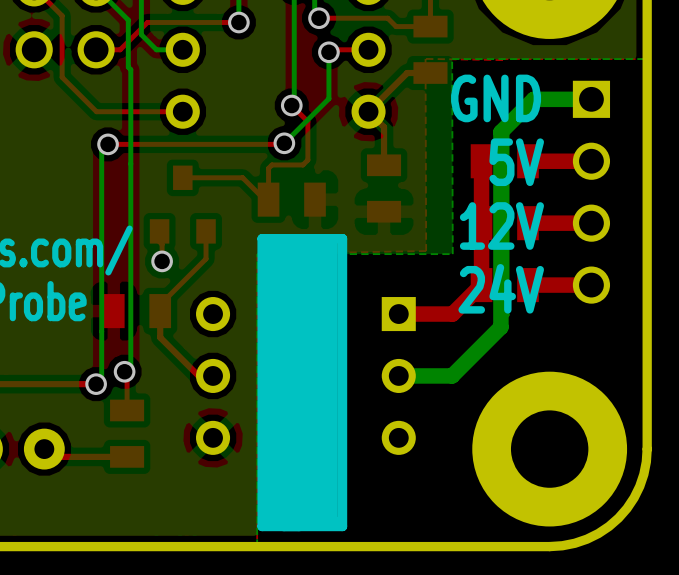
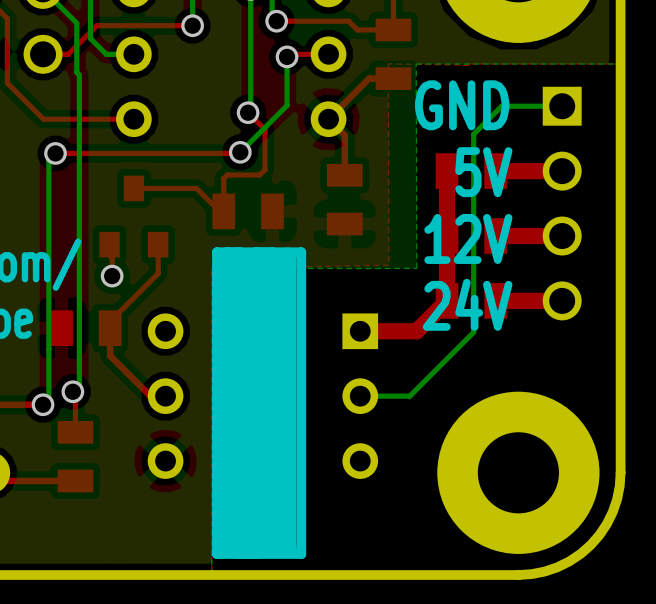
bottom track: (533, 99) (500, 132) (500, 327) (452, 375) (398, 375) -> none
bottom track width: thick (591, 99) (533, 99) -> thin (562, 106) (501, 106)

